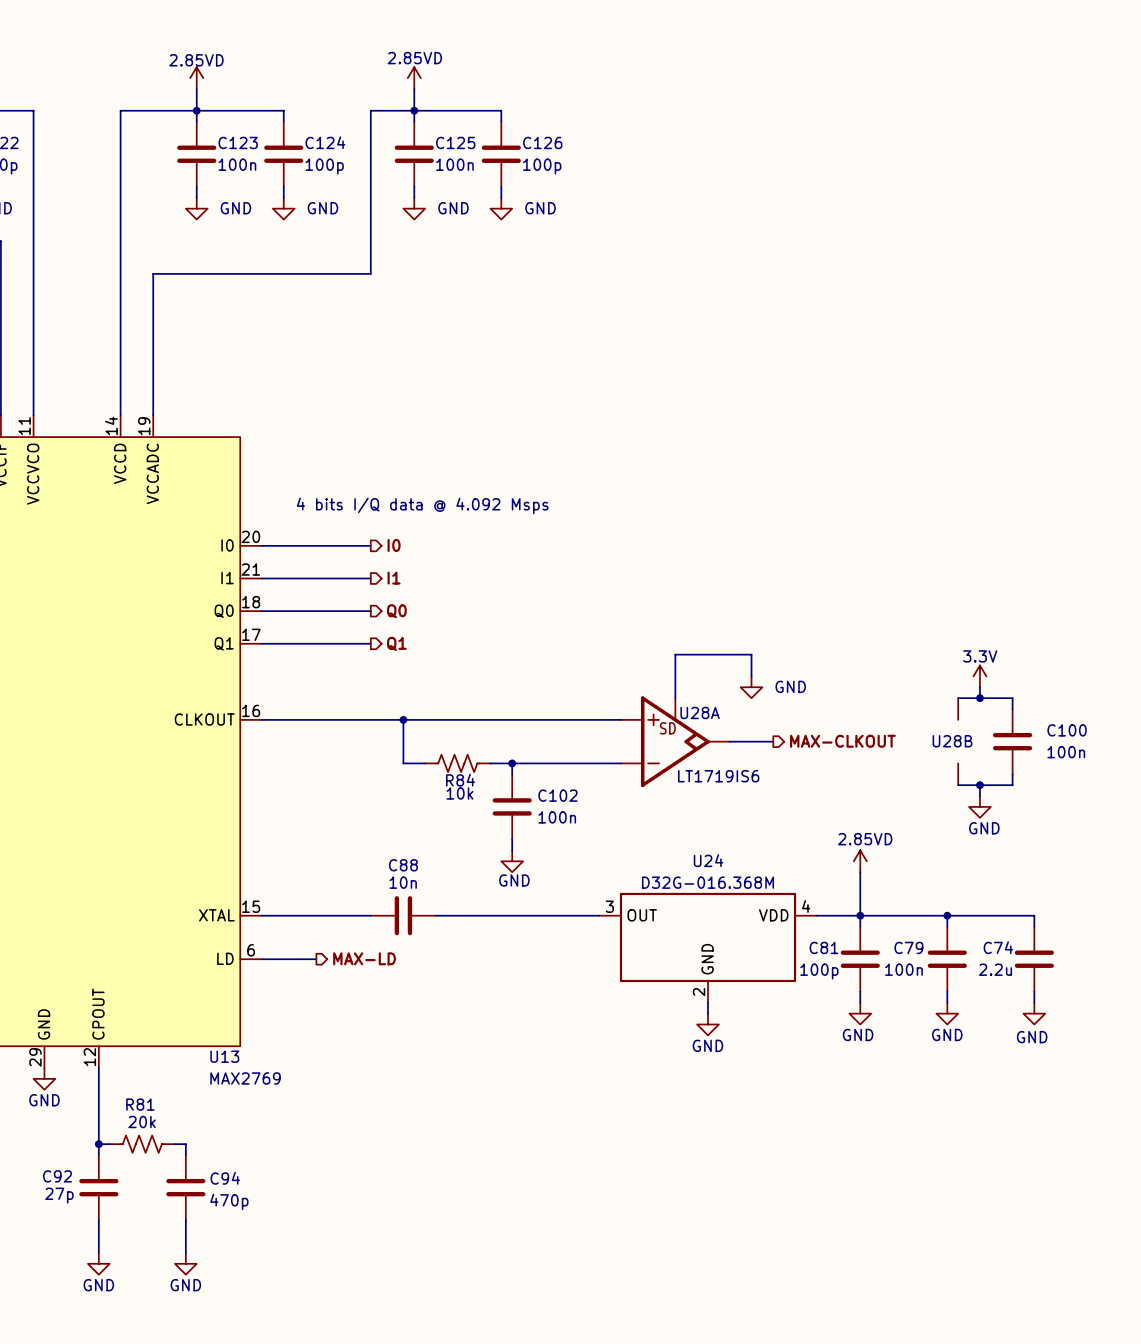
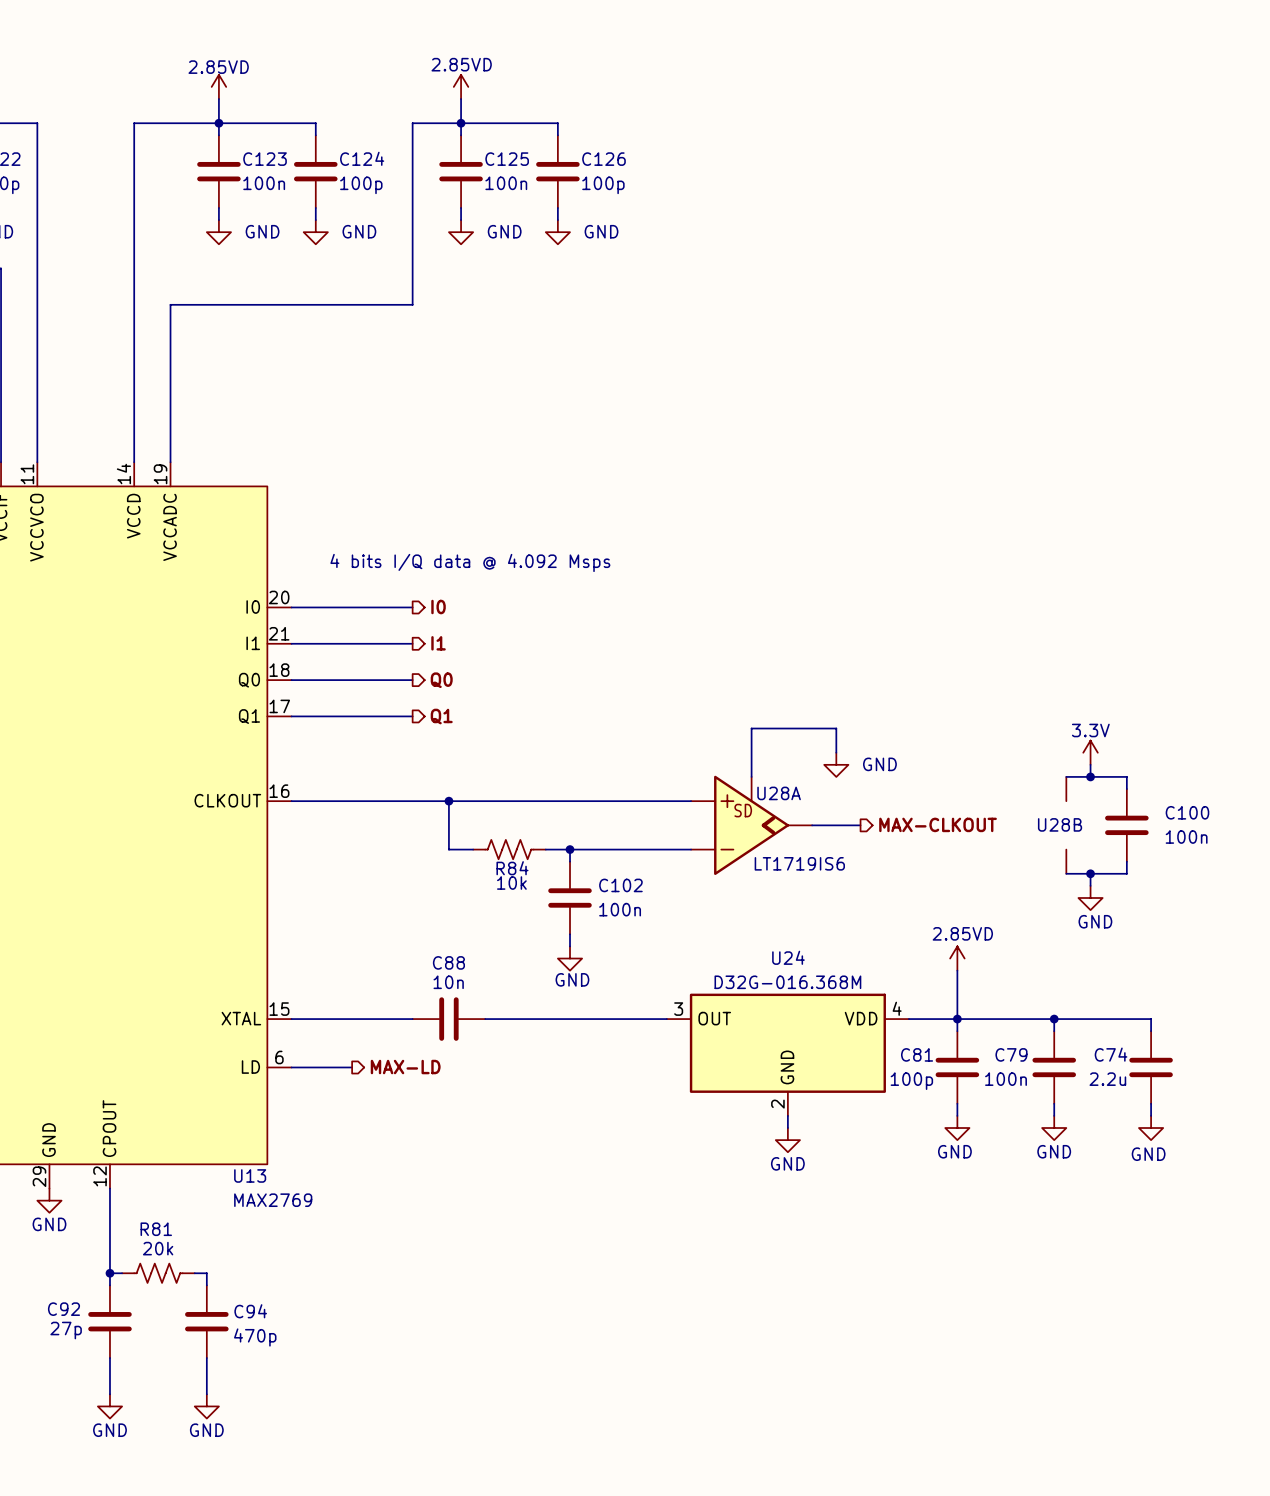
U28A symbol: [620, 696, 730, 787] -> [691, 775, 813, 876]
U24 symbol: [599, 892, 817, 1003] -> [666, 993, 909, 1116]

